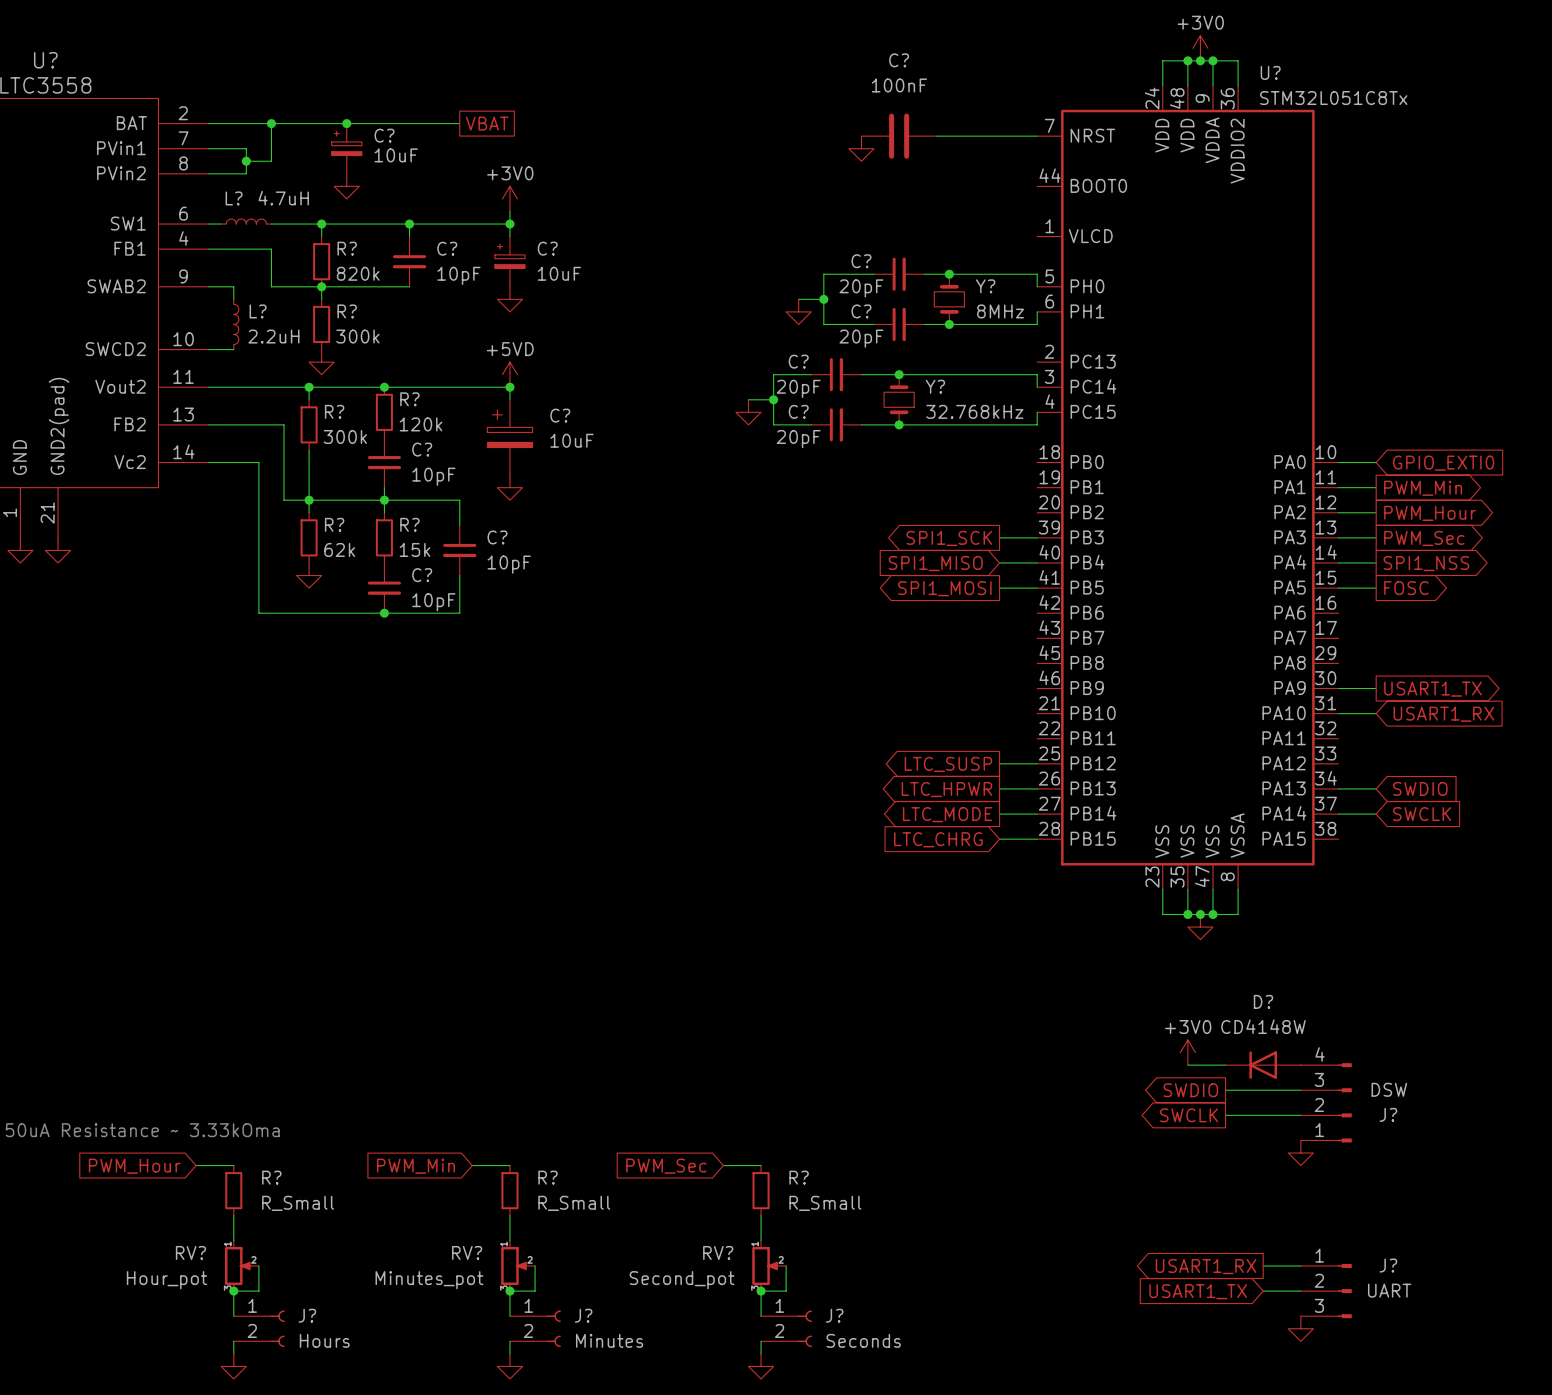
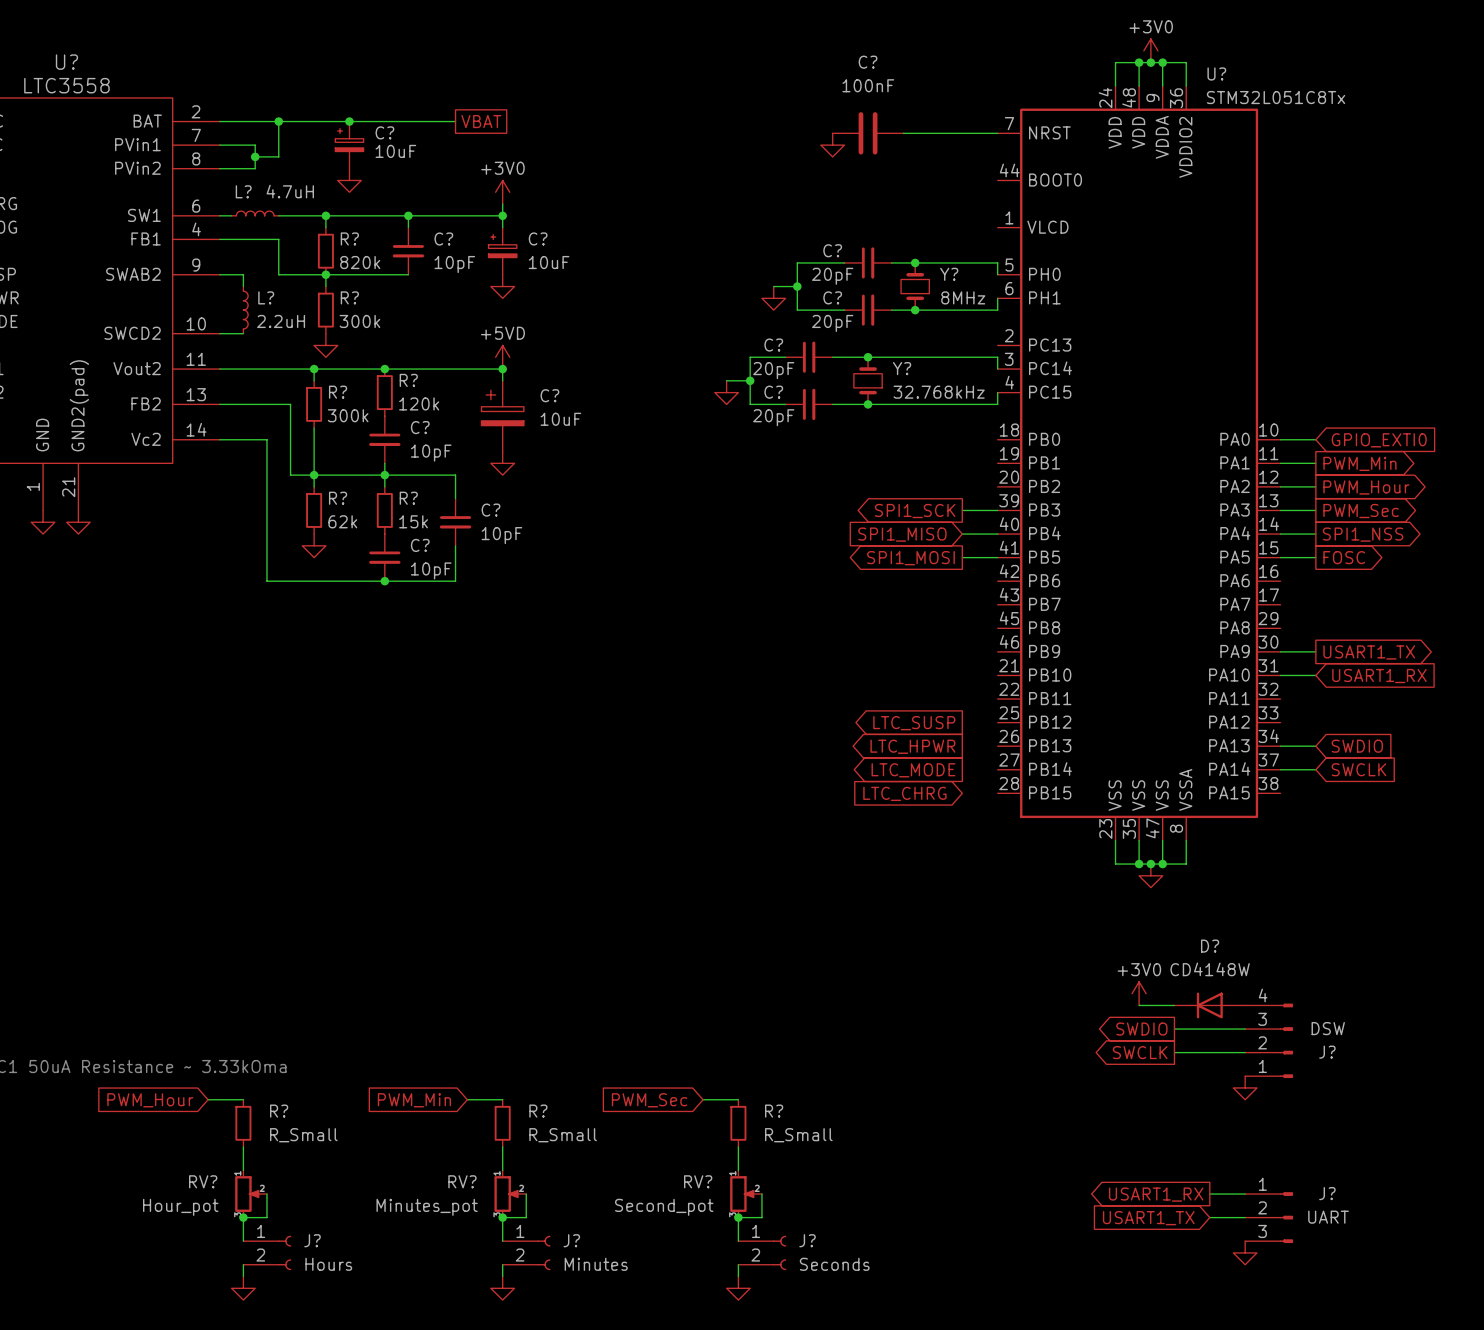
wire: (999, 763) (1037, 763) -> none
wire: (999, 788) (1037, 788) -> none
wire: (999, 814) (1037, 814) -> none
wire: (999, 839) (1037, 839) -> none

